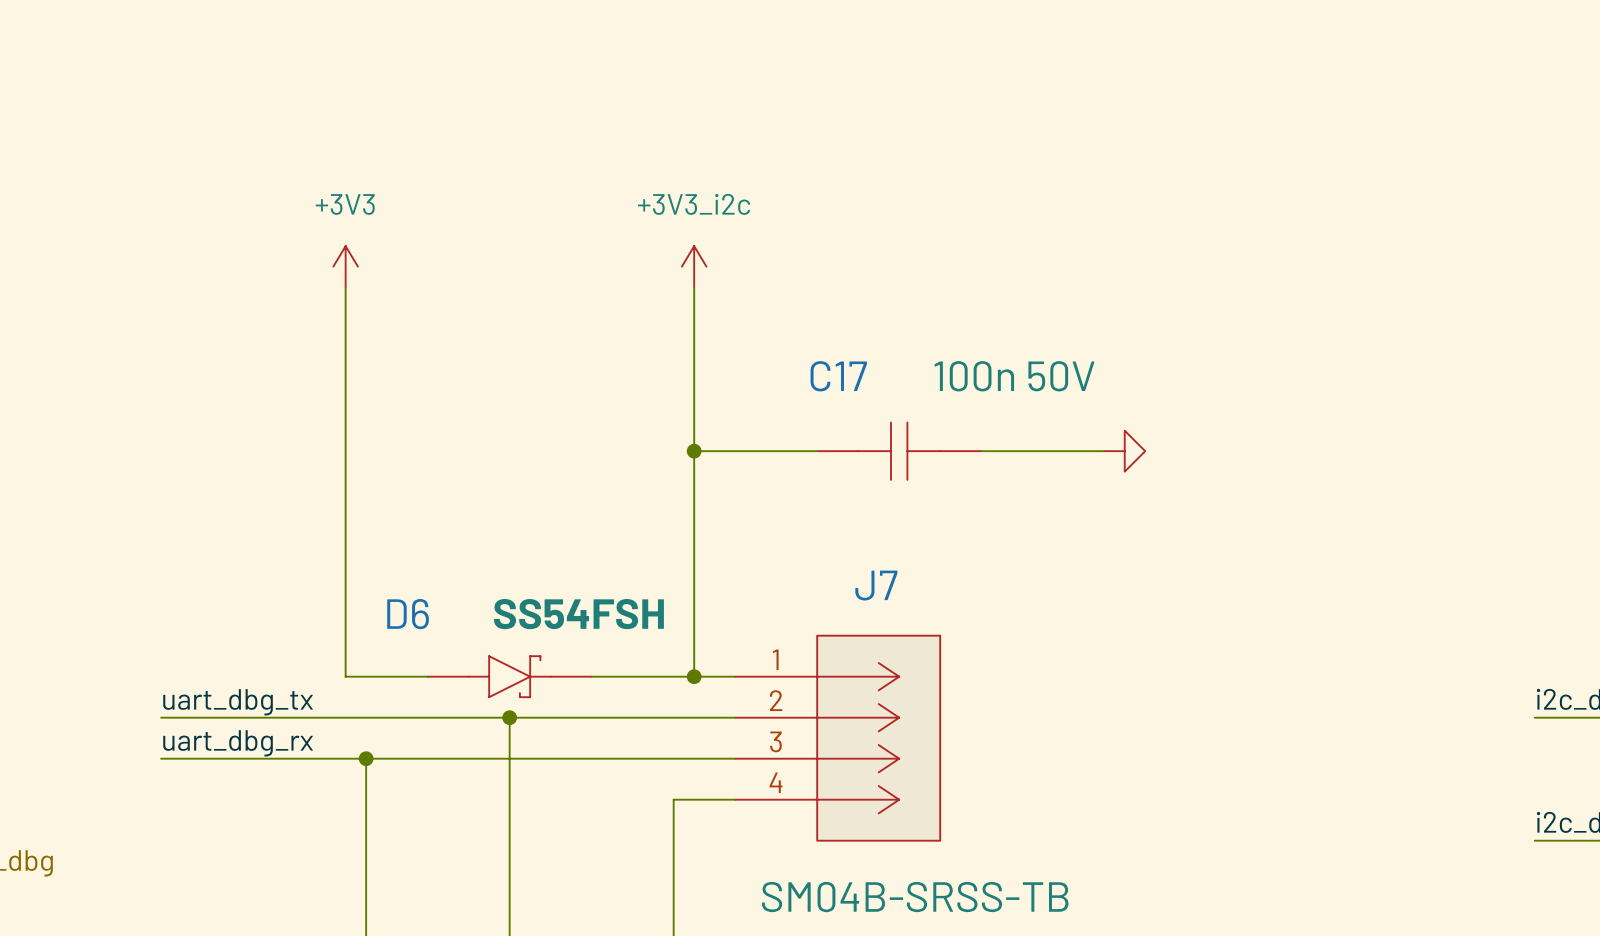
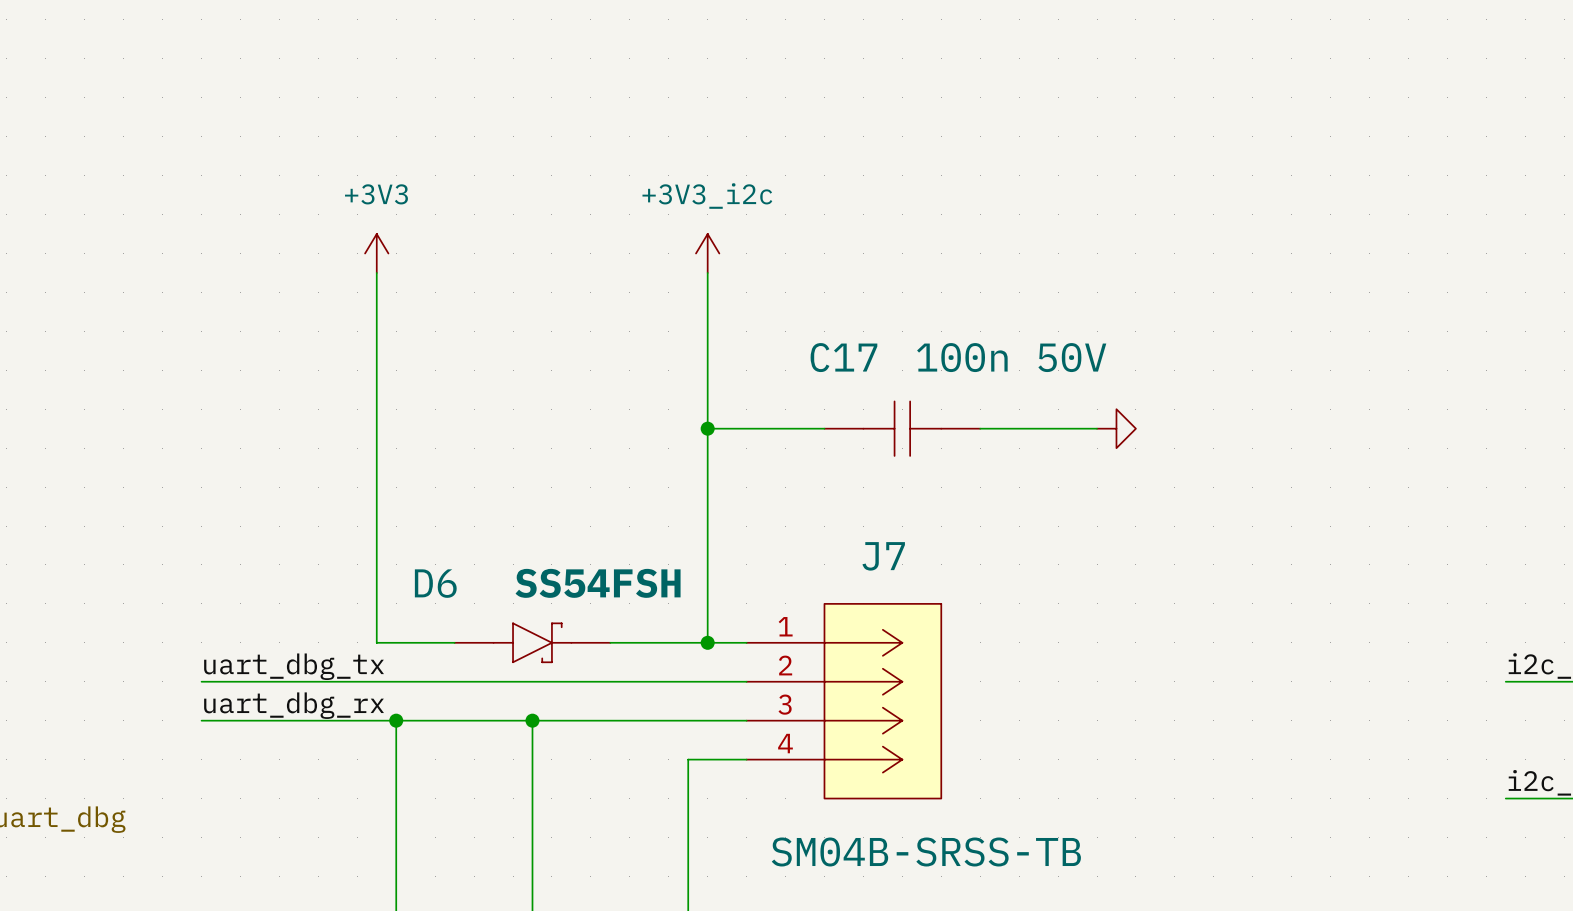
wire: (509, 717) (509, 758) -> none
junction position: (509, 717) -> (532, 720)

